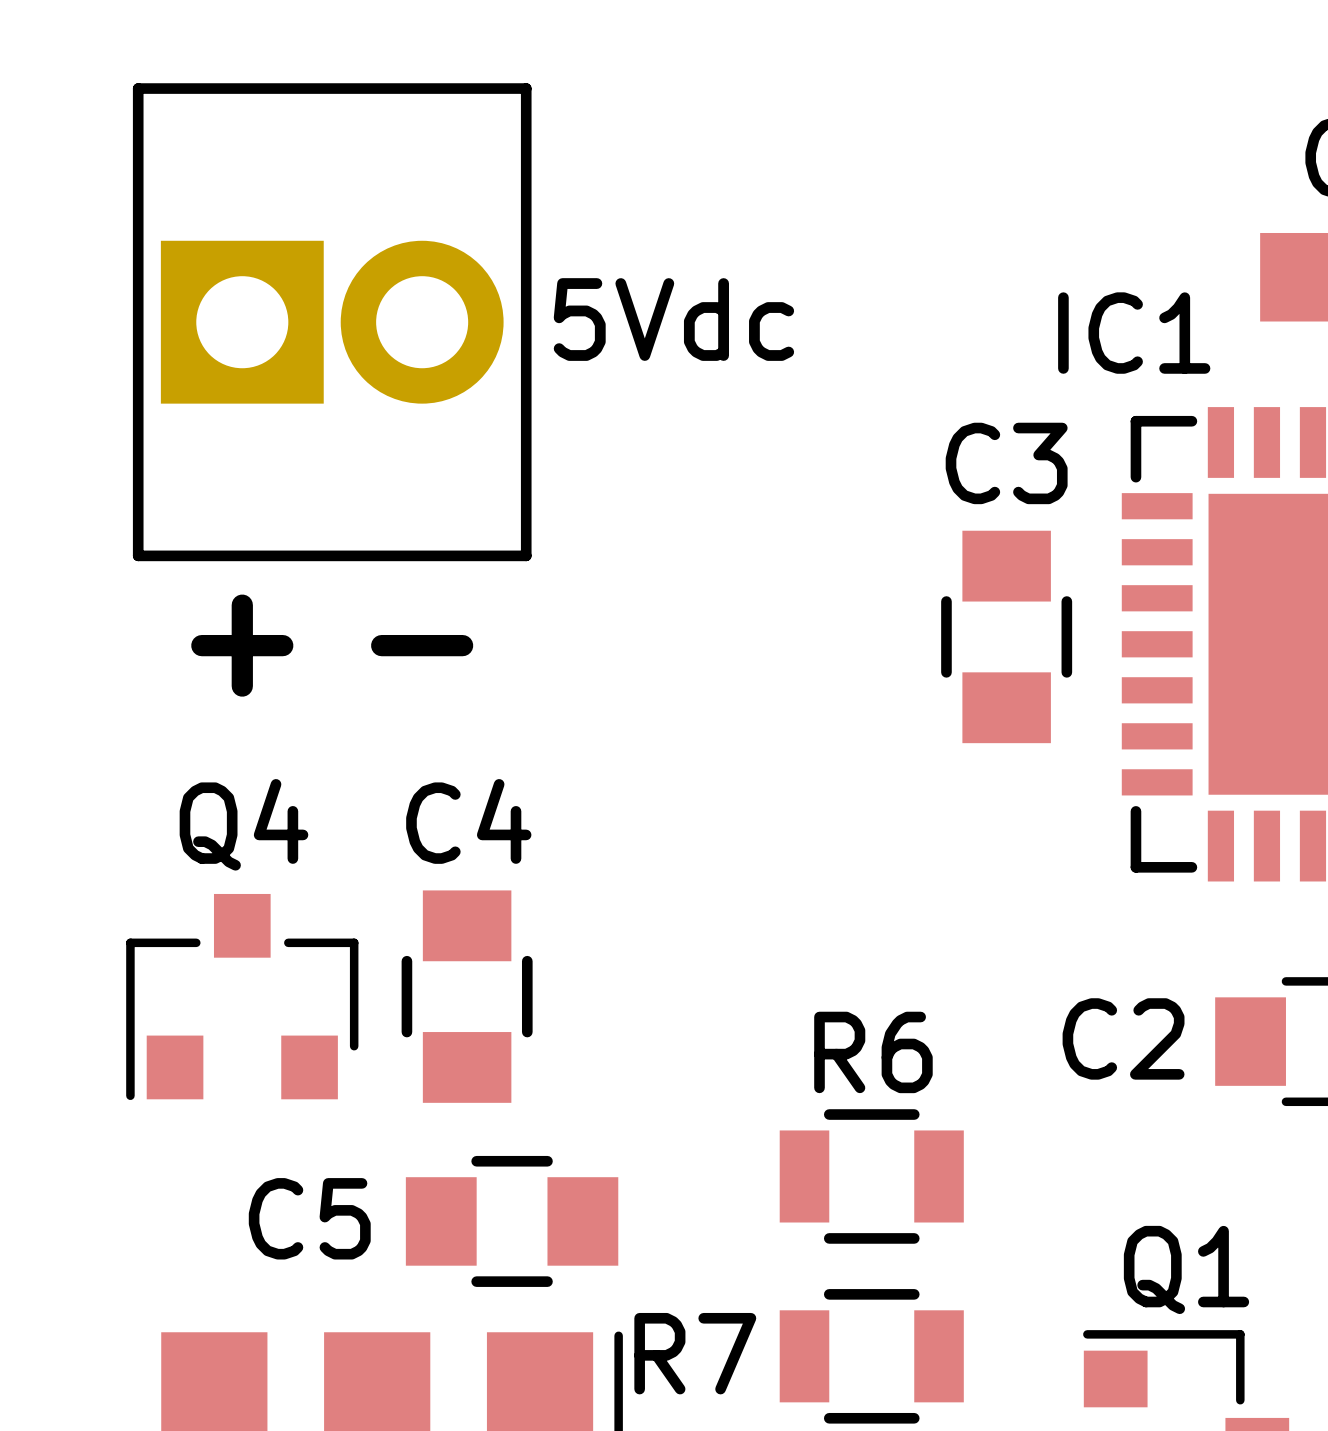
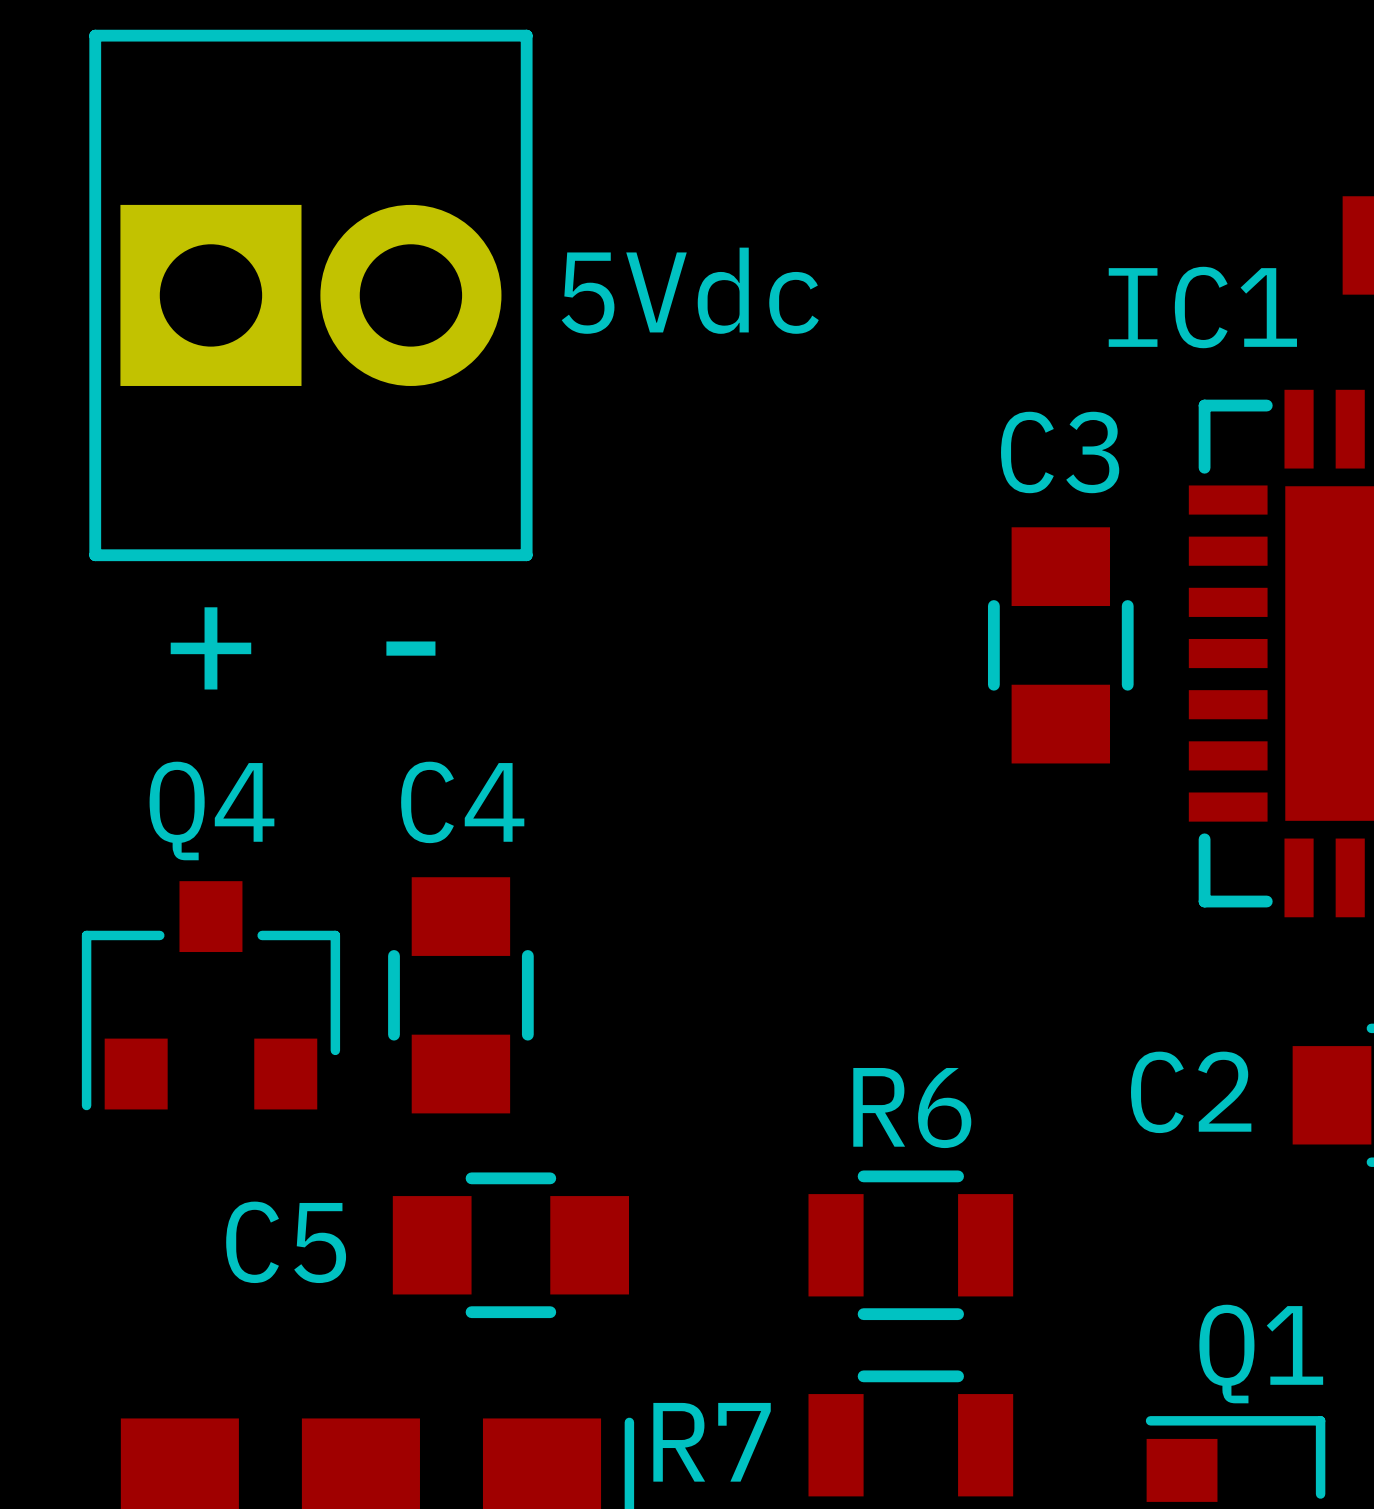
Q4 position: (242, 996) -> (210, 995)
C4 position: (467, 996) -> (460, 995)
C5 position: (512, 1221) -> (510, 1245)

